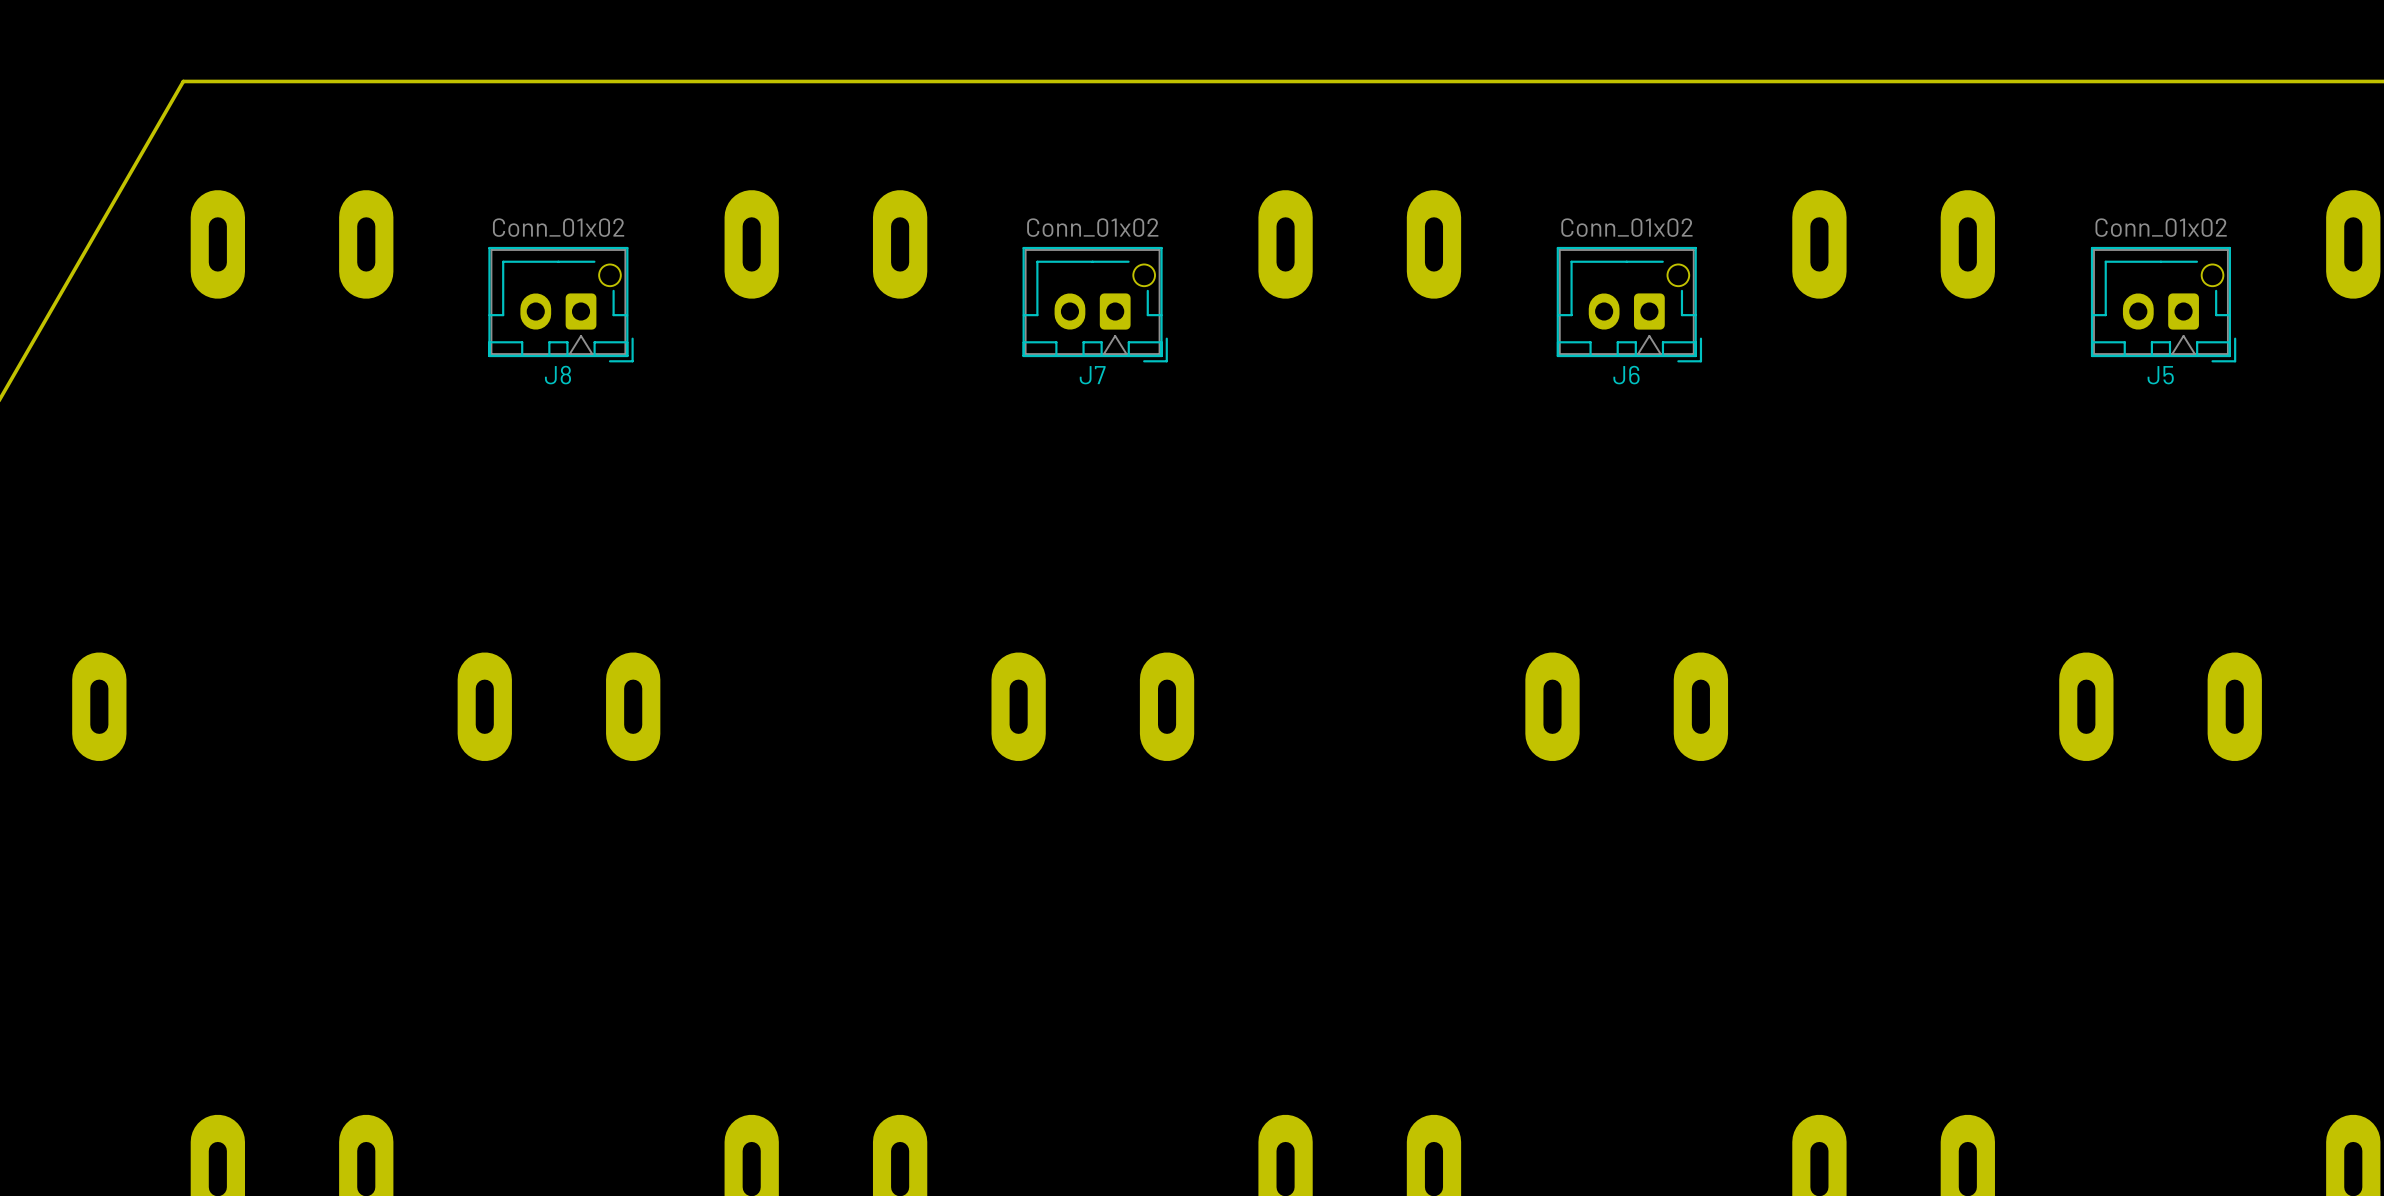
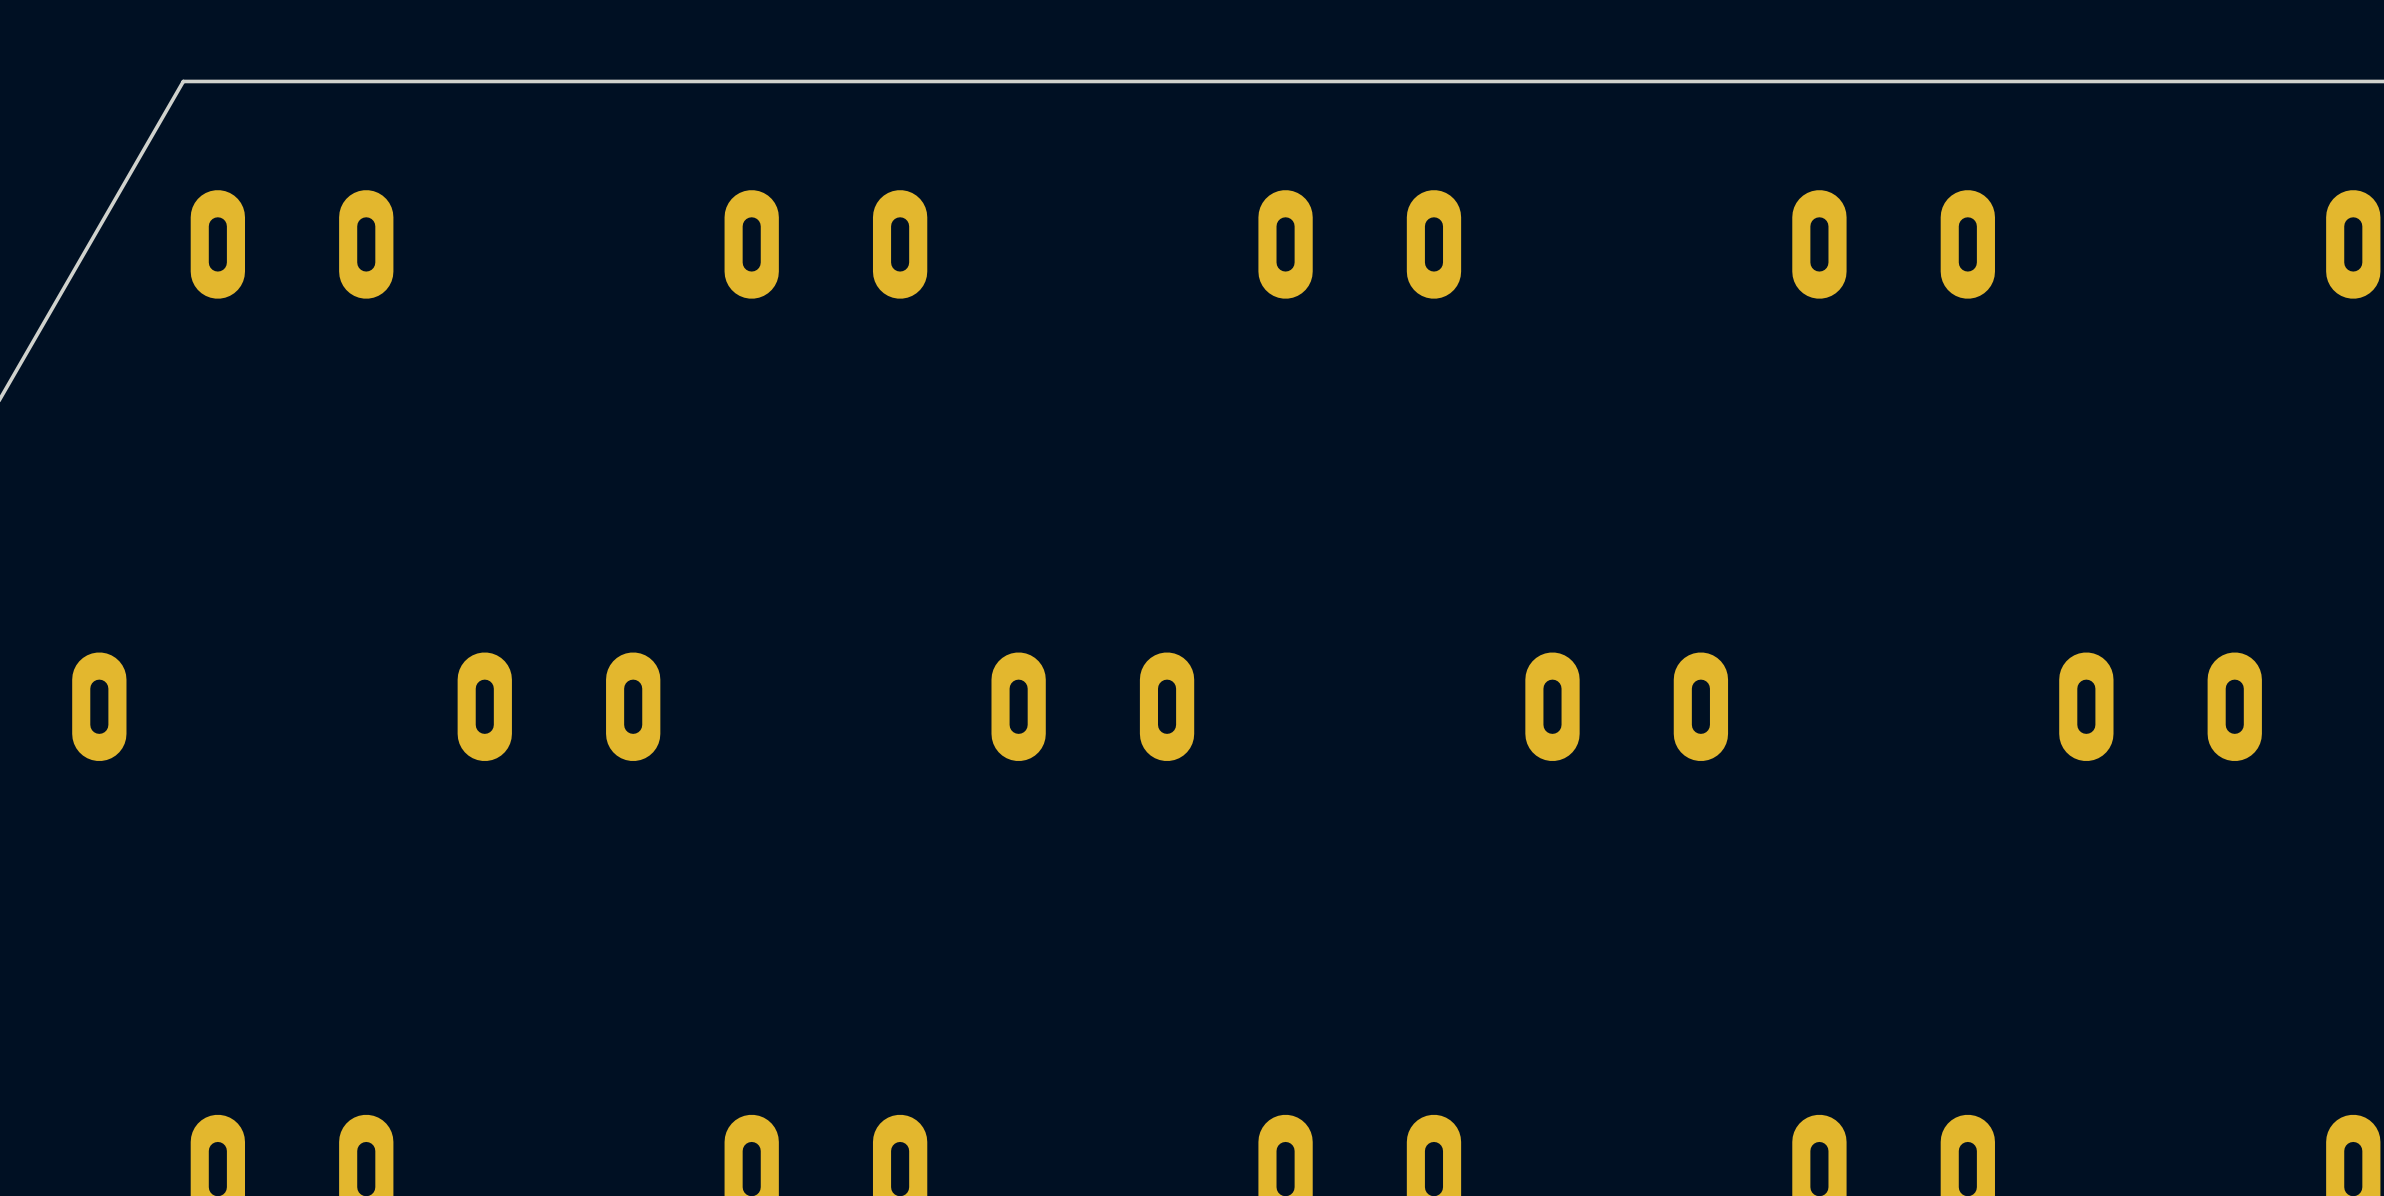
J8: Conn_01x02 (561, 304) -> none
J7: Conn_01x02 (1095, 304) -> none
J6: Conn_01x02 (1629, 304) -> none
J5: Conn_01x02 (2163, 304) -> none

